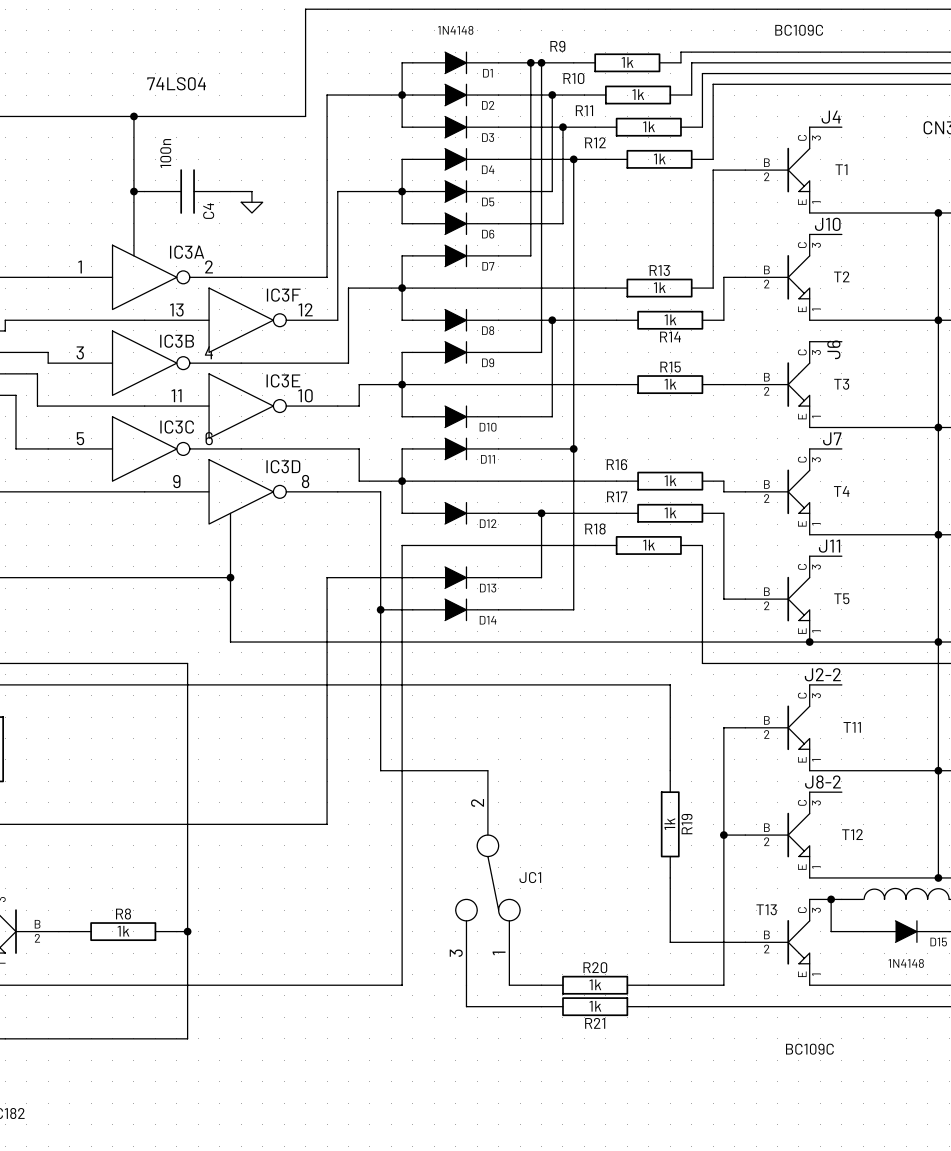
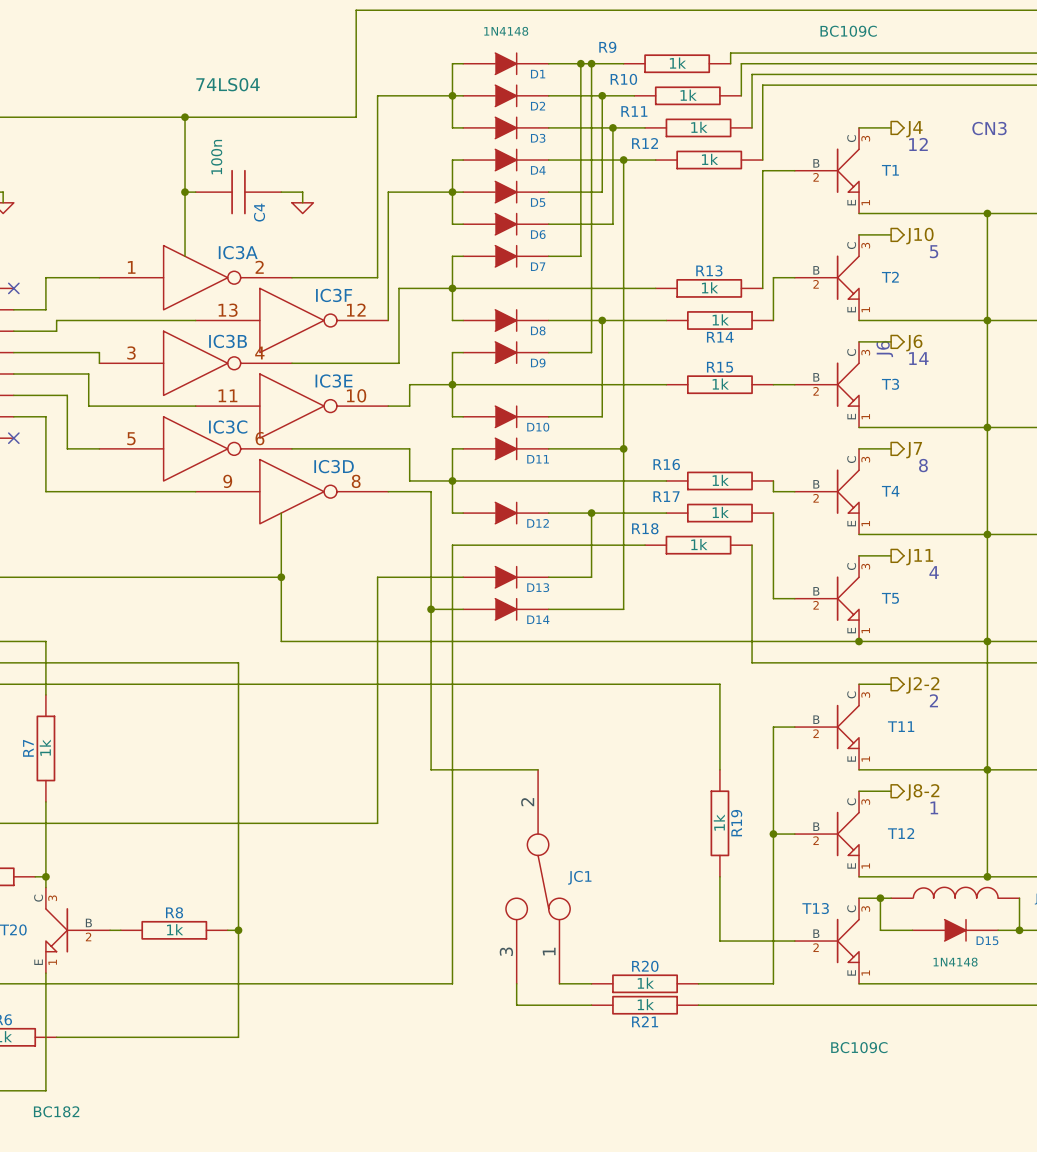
text: J4 (831, 117) -> none
hierarchical label: none -> J4 (914, 129)
text: none -> 12 (918, 144)
text: J10 (827, 224) -> none
hierarchical label: none -> J10 (919, 236)
text: none -> 5 (934, 251)
hierarchical label: none -> J6 (914, 343)
text: none -> 14 (918, 358)
text: J7 (832, 438) -> none
hierarchical label: none -> J7 (914, 450)
text: none -> 8 (923, 465)
text: J11 (829, 546) -> none
hierarchical label: none -> J11 (919, 557)
text: none -> 4 (934, 572)
text: J2-2 (822, 674) -> none
hierarchical label: none -> J2-2 (922, 685)
text: none -> 2 (933, 700)
text: J8-2 (822, 782) -> none
hierarchical label: none -> J8-2 (922, 792)
text: none -> 1 (934, 807)

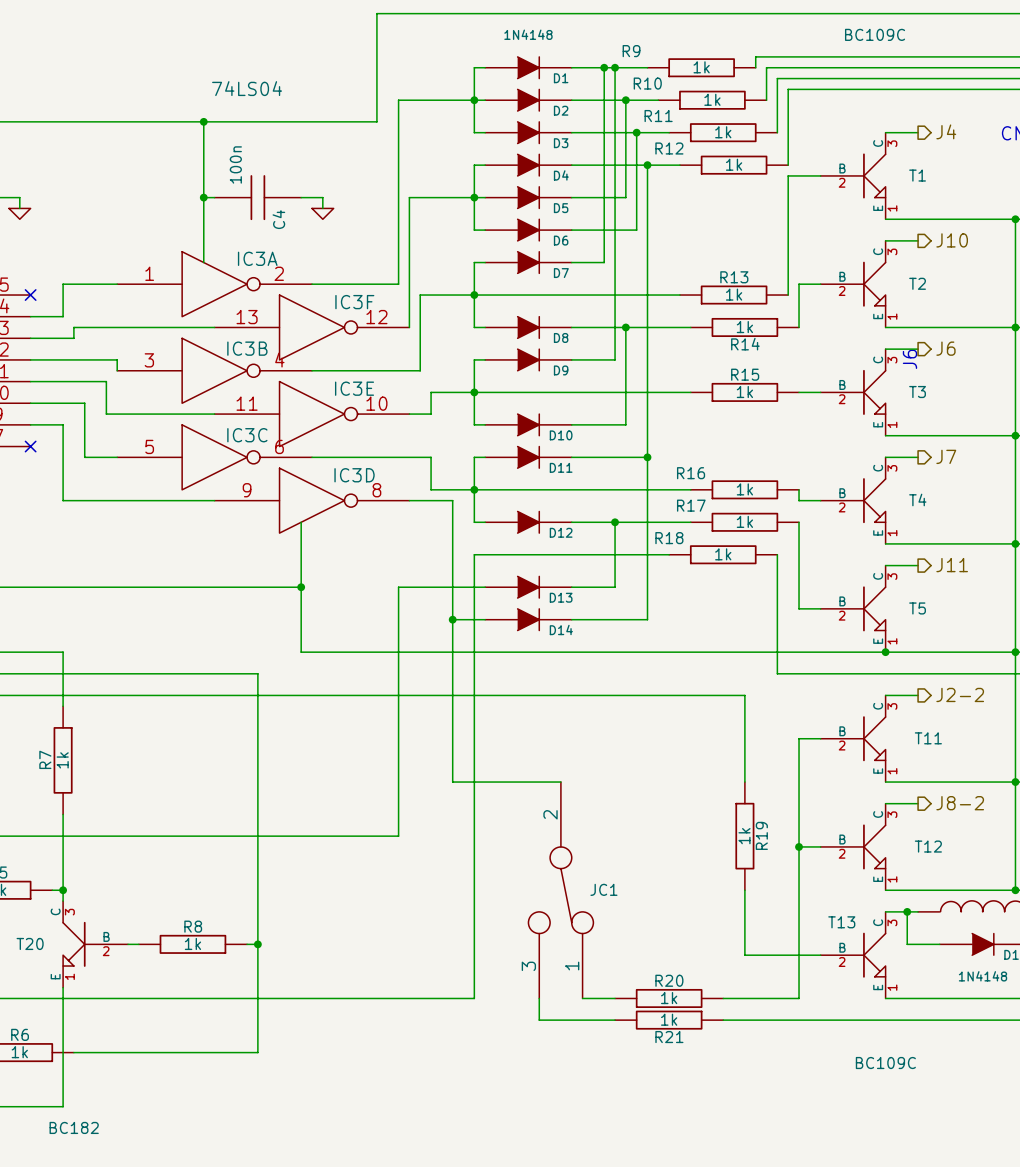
text: 12 (918, 144) -> none
text: 5 (934, 251) -> none
text: 14 (918, 358) -> none
text: 8 (923, 465) -> none
text: 4 (934, 572) -> none
text: 2 (933, 700) -> none
text: 1 (934, 807) -> none

